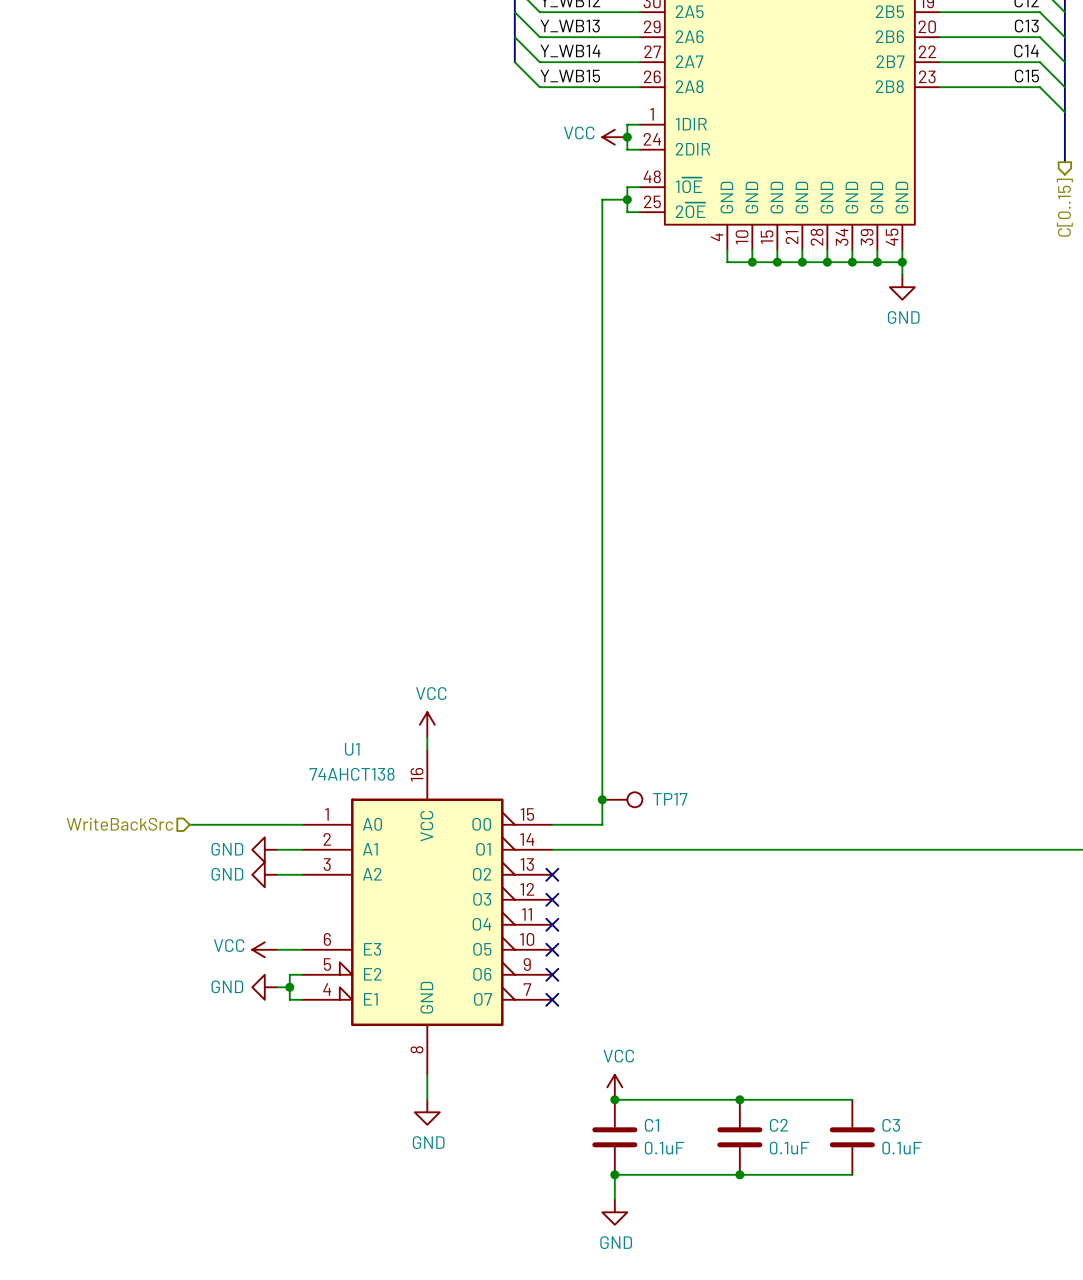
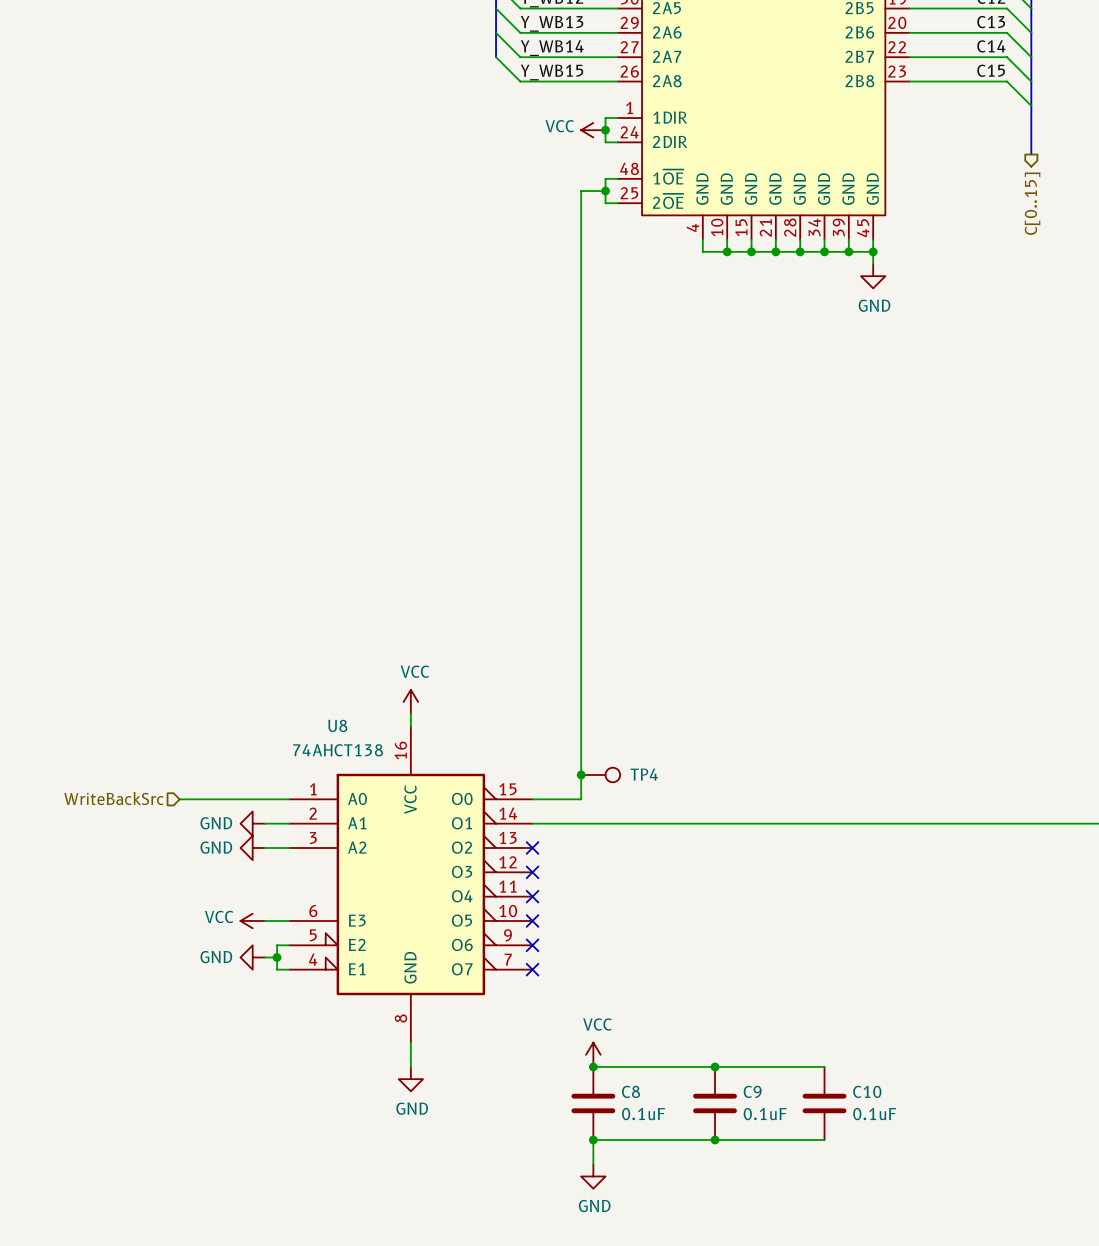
U1 name: U1 (352, 749) -> U8 (337, 725)
TP17 name: TP17 (670, 799) -> TP4 (644, 774)
C1 name: C1 (651, 1125) -> C8 (631, 1091)
C2 name: C2 (778, 1125) -> C9 (752, 1091)
C3 name: C3 (891, 1125) -> C10 (867, 1091)

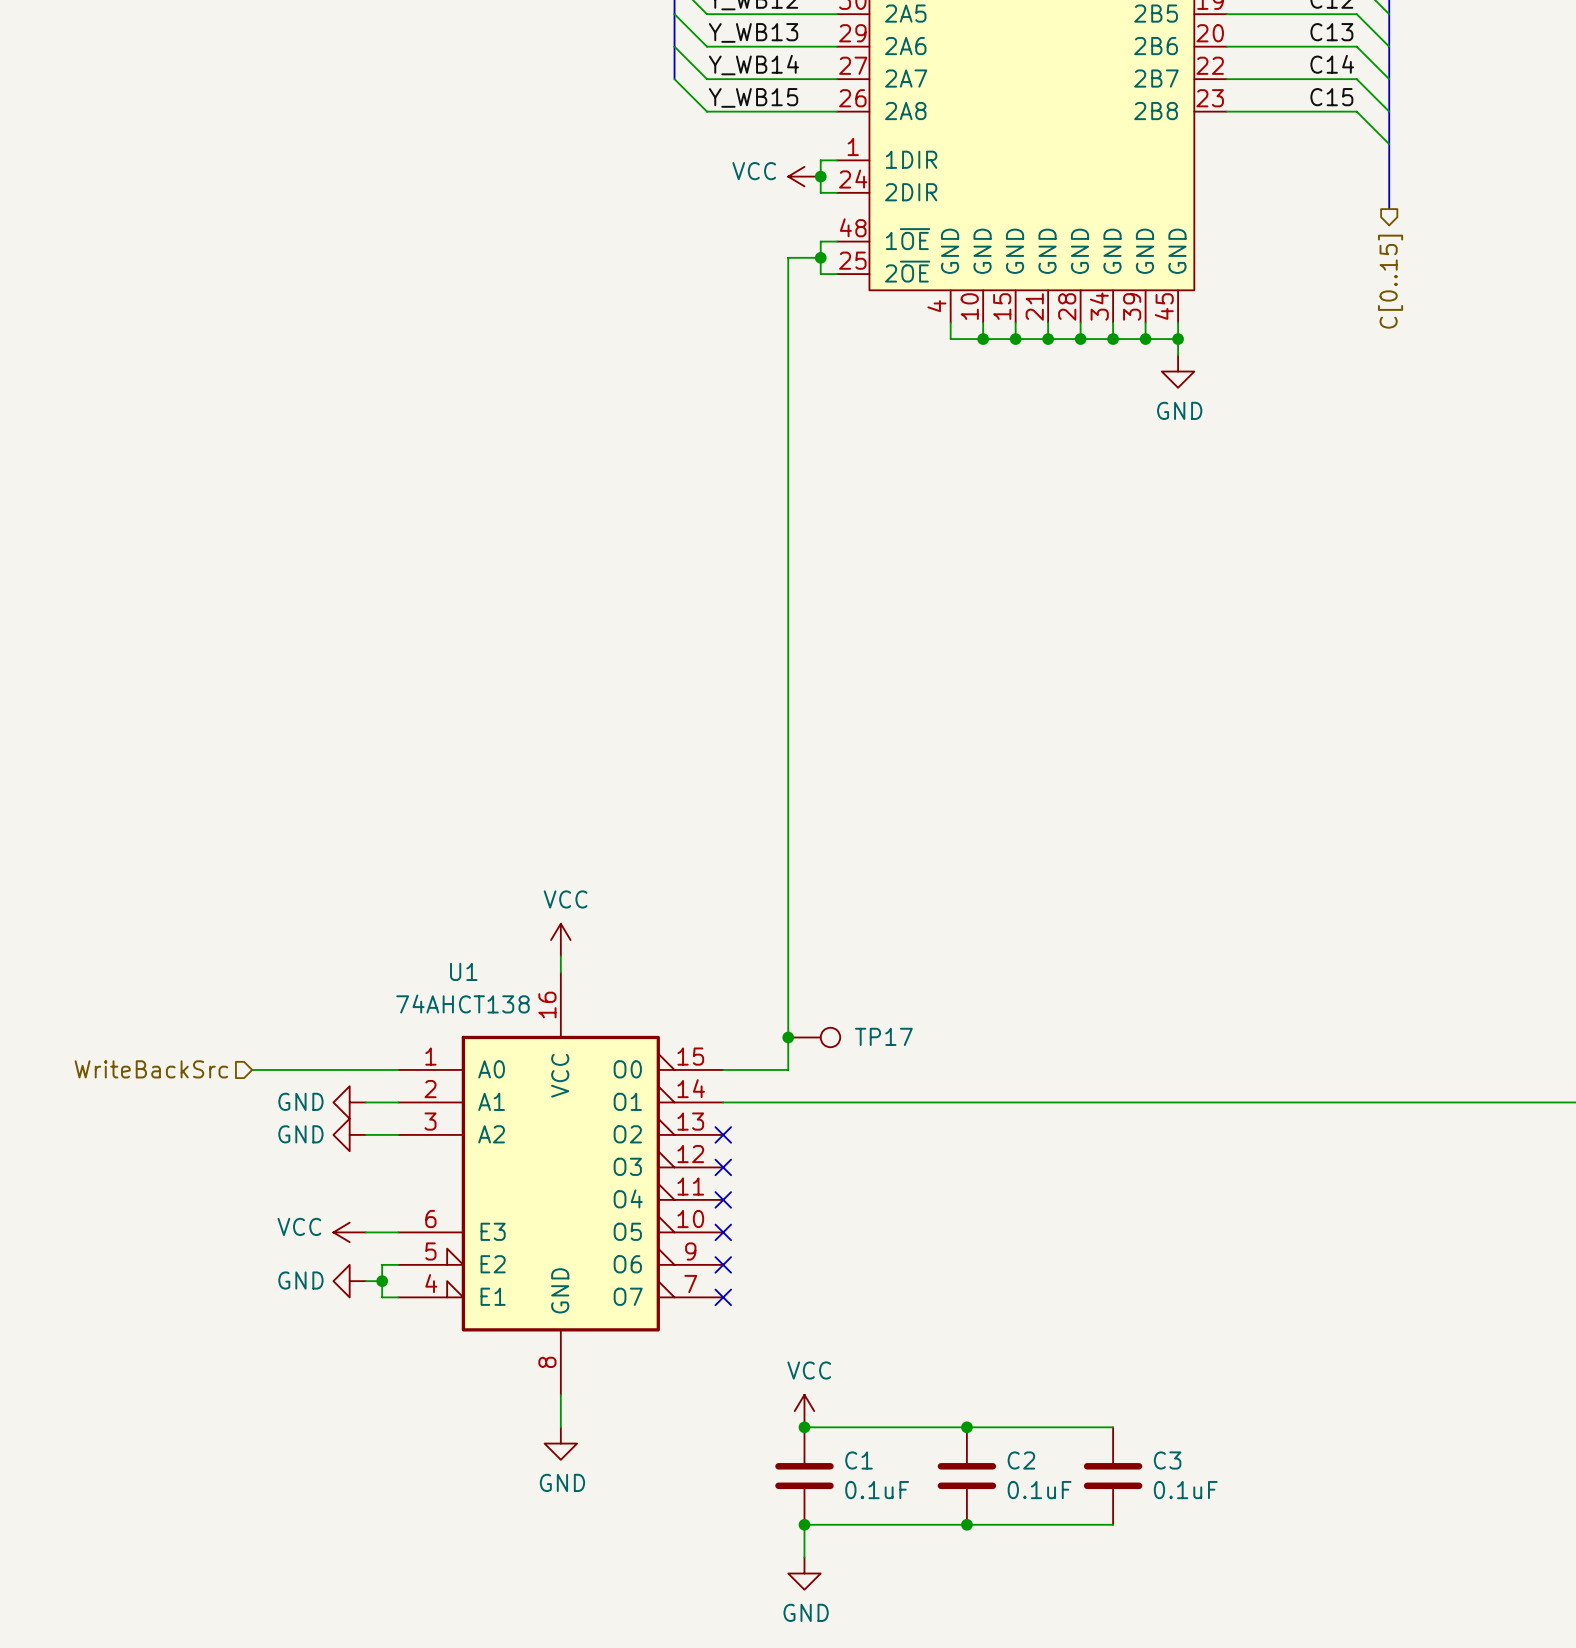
U8 name: U8 (337, 725) -> U1 (463, 971)
TP4 name: TP4 (644, 774) -> TP17 (883, 1036)
C8 name: C8 (631, 1091) -> C1 (858, 1460)
C9 name: C9 (752, 1091) -> C2 (1021, 1460)
C10 name: C10 (867, 1091) -> C3 (1167, 1460)

